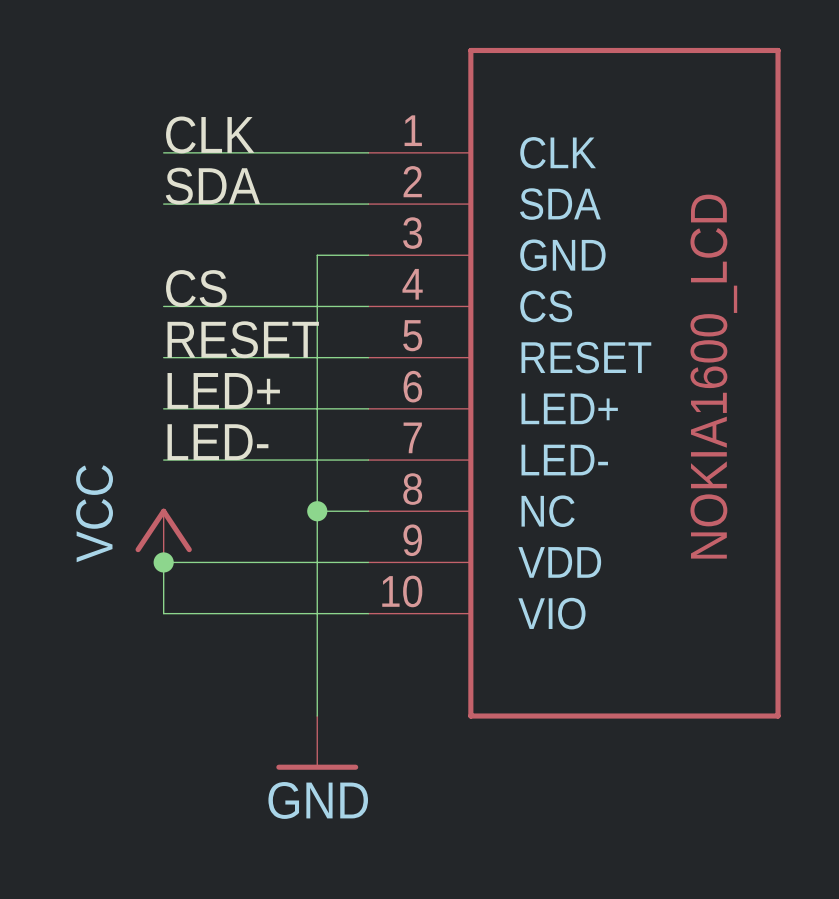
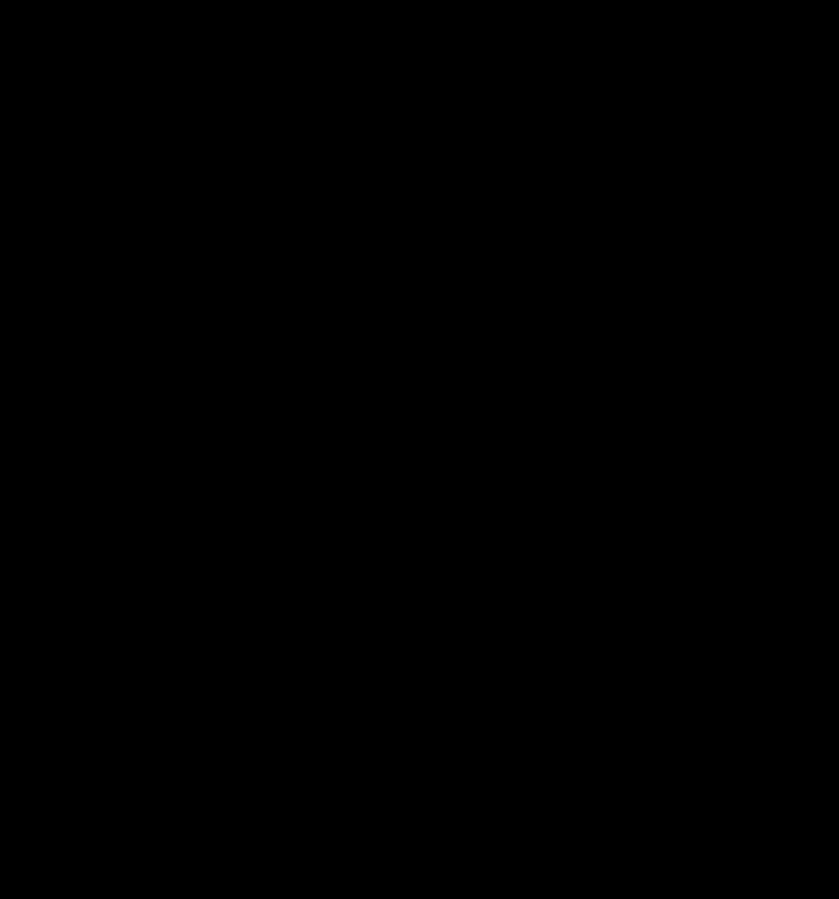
label: CLK (210, 134) -> none
wire: (163, 152) (368, 152) -> none
label: SDA (212, 186) -> none
wire: (163, 204) (368, 204) -> none
wire: (368, 255) (317, 255) (317, 716) -> none
label: CS (196, 288) -> none
wire: (163, 306) (368, 306) -> none
label: RESET (243, 339) -> none
wire: (163, 357) (368, 357) -> none
part: (574, 383) -> none
label: LED+ (223, 390) -> none
wire: (163, 408) (368, 408) -> none
label: LED- (217, 442) -> none
wire: (163, 460) (368, 460) -> none
wire: (317, 511) (368, 511) -> none
junction: (317, 511) -> none
power symbol: VCC (163, 535) -> none
junction: (163, 562) -> none
wire: (368, 562) (163, 562) (163, 613) (368, 613) -> none
power symbol: GND (317, 742) -> none

